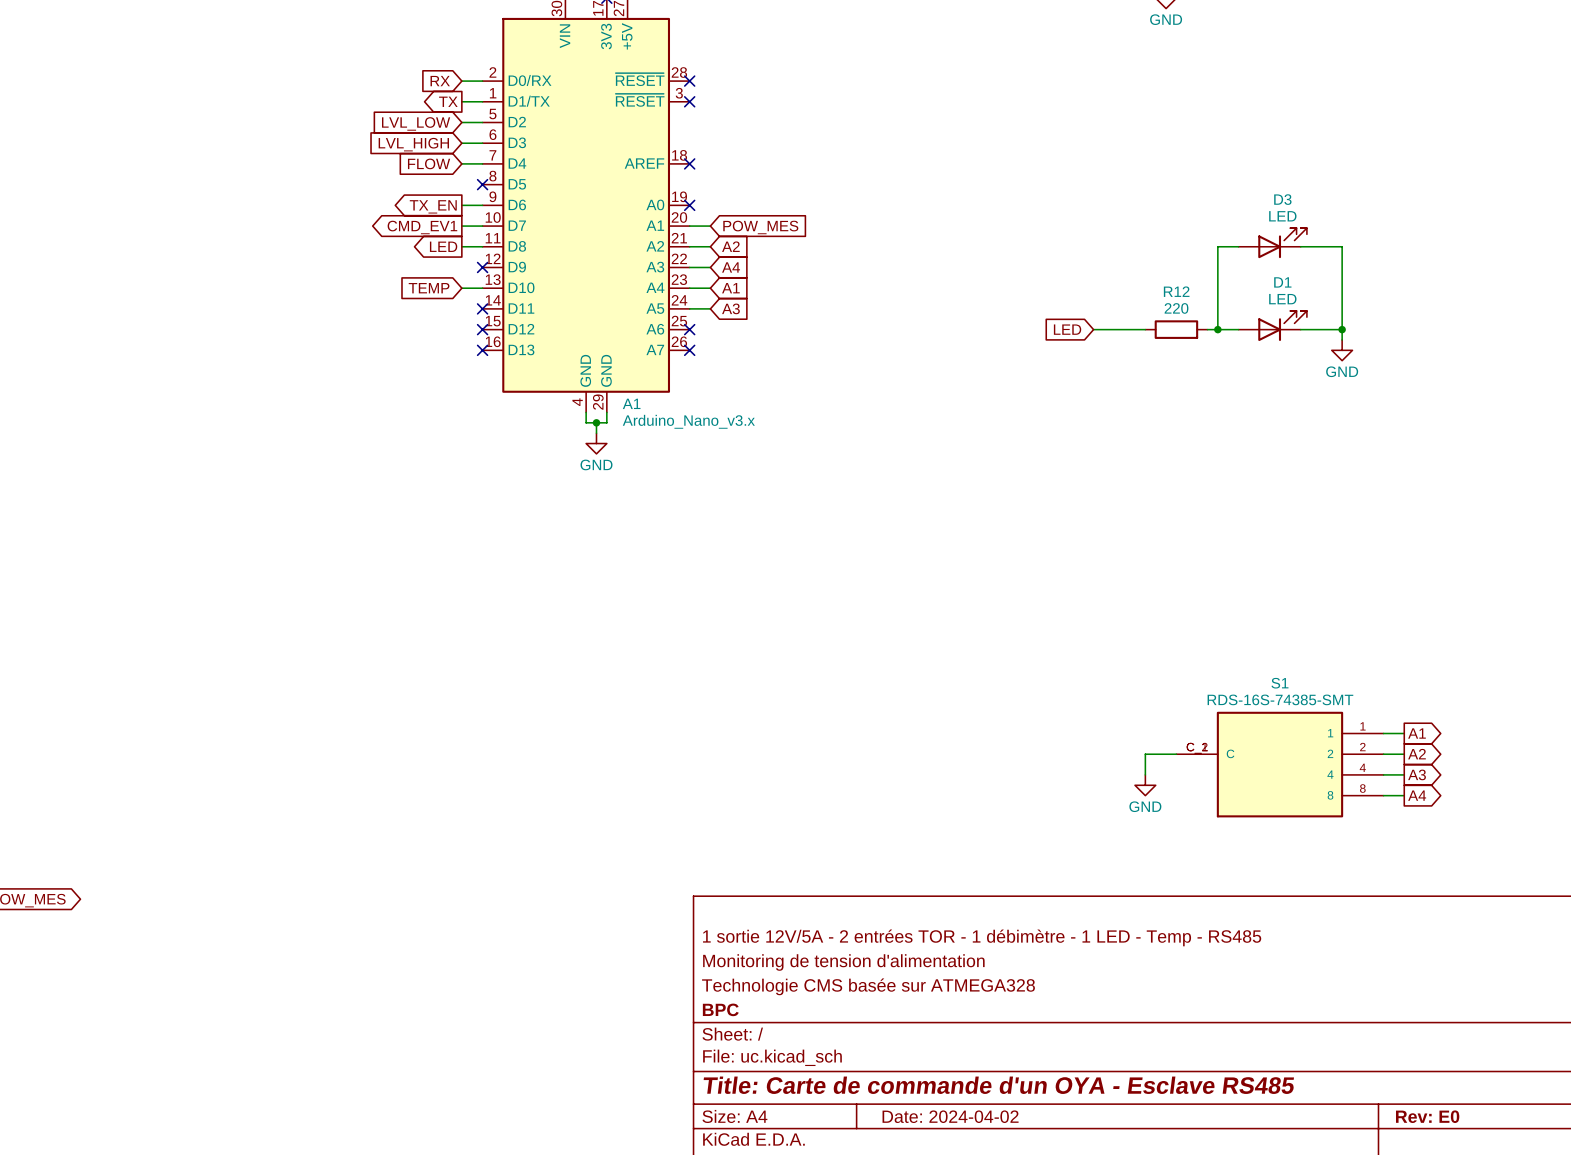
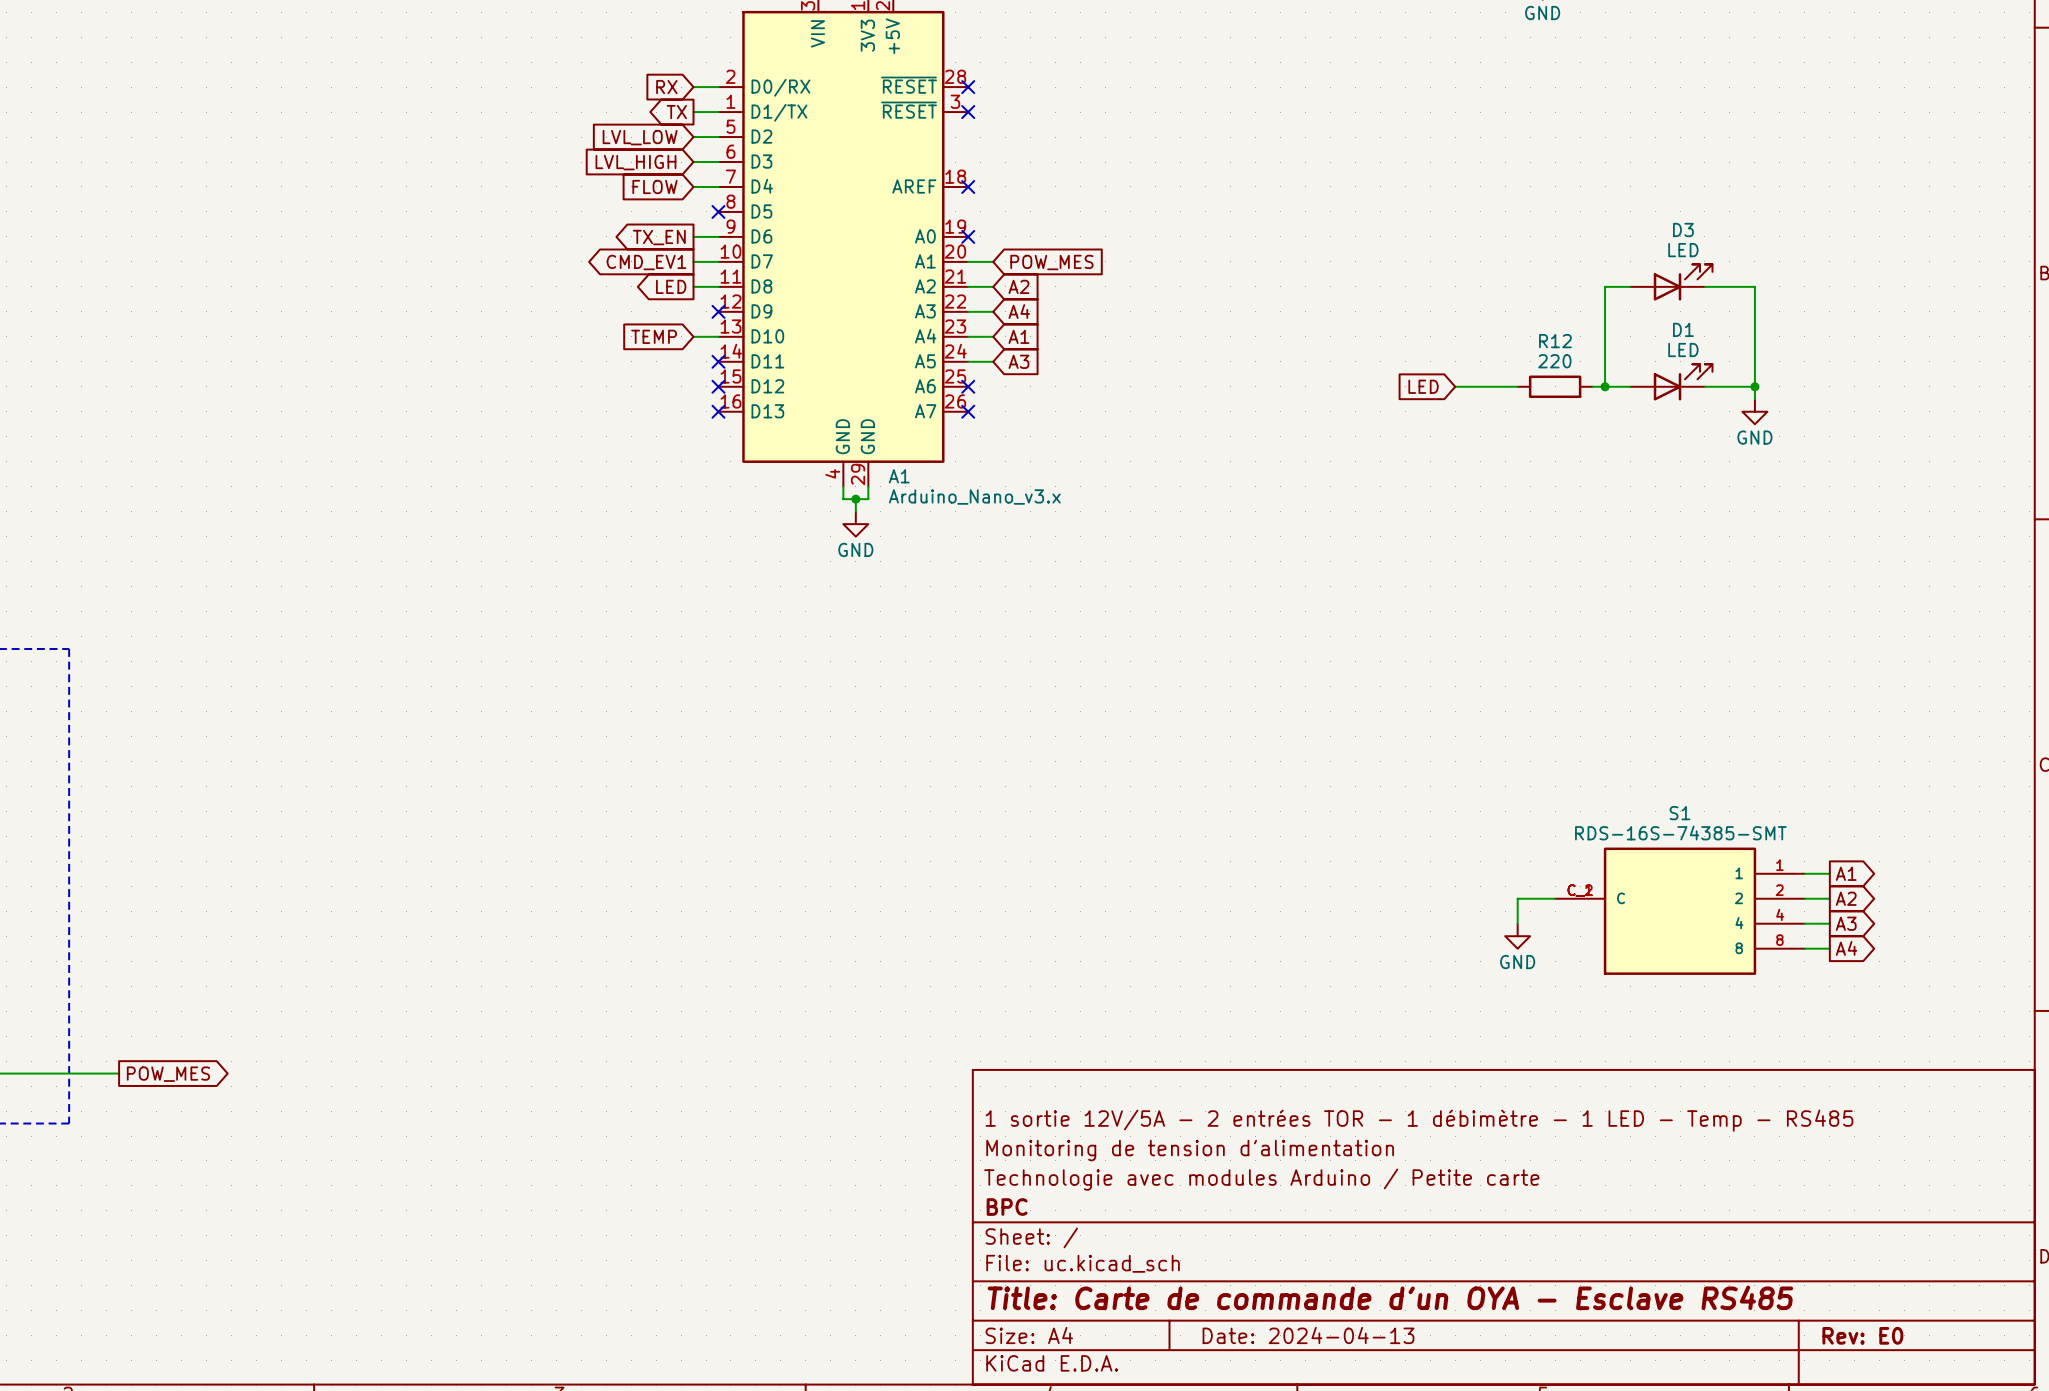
title block: Technologie CMS basée sur ATMEGA328 (868, 986) -> Technologie avec modules Arduino / Petite carte (1261, 1179)
title block: Date: 2024-04-02 (950, 1116) -> Date: 2024-04-13 (1308, 1335)

